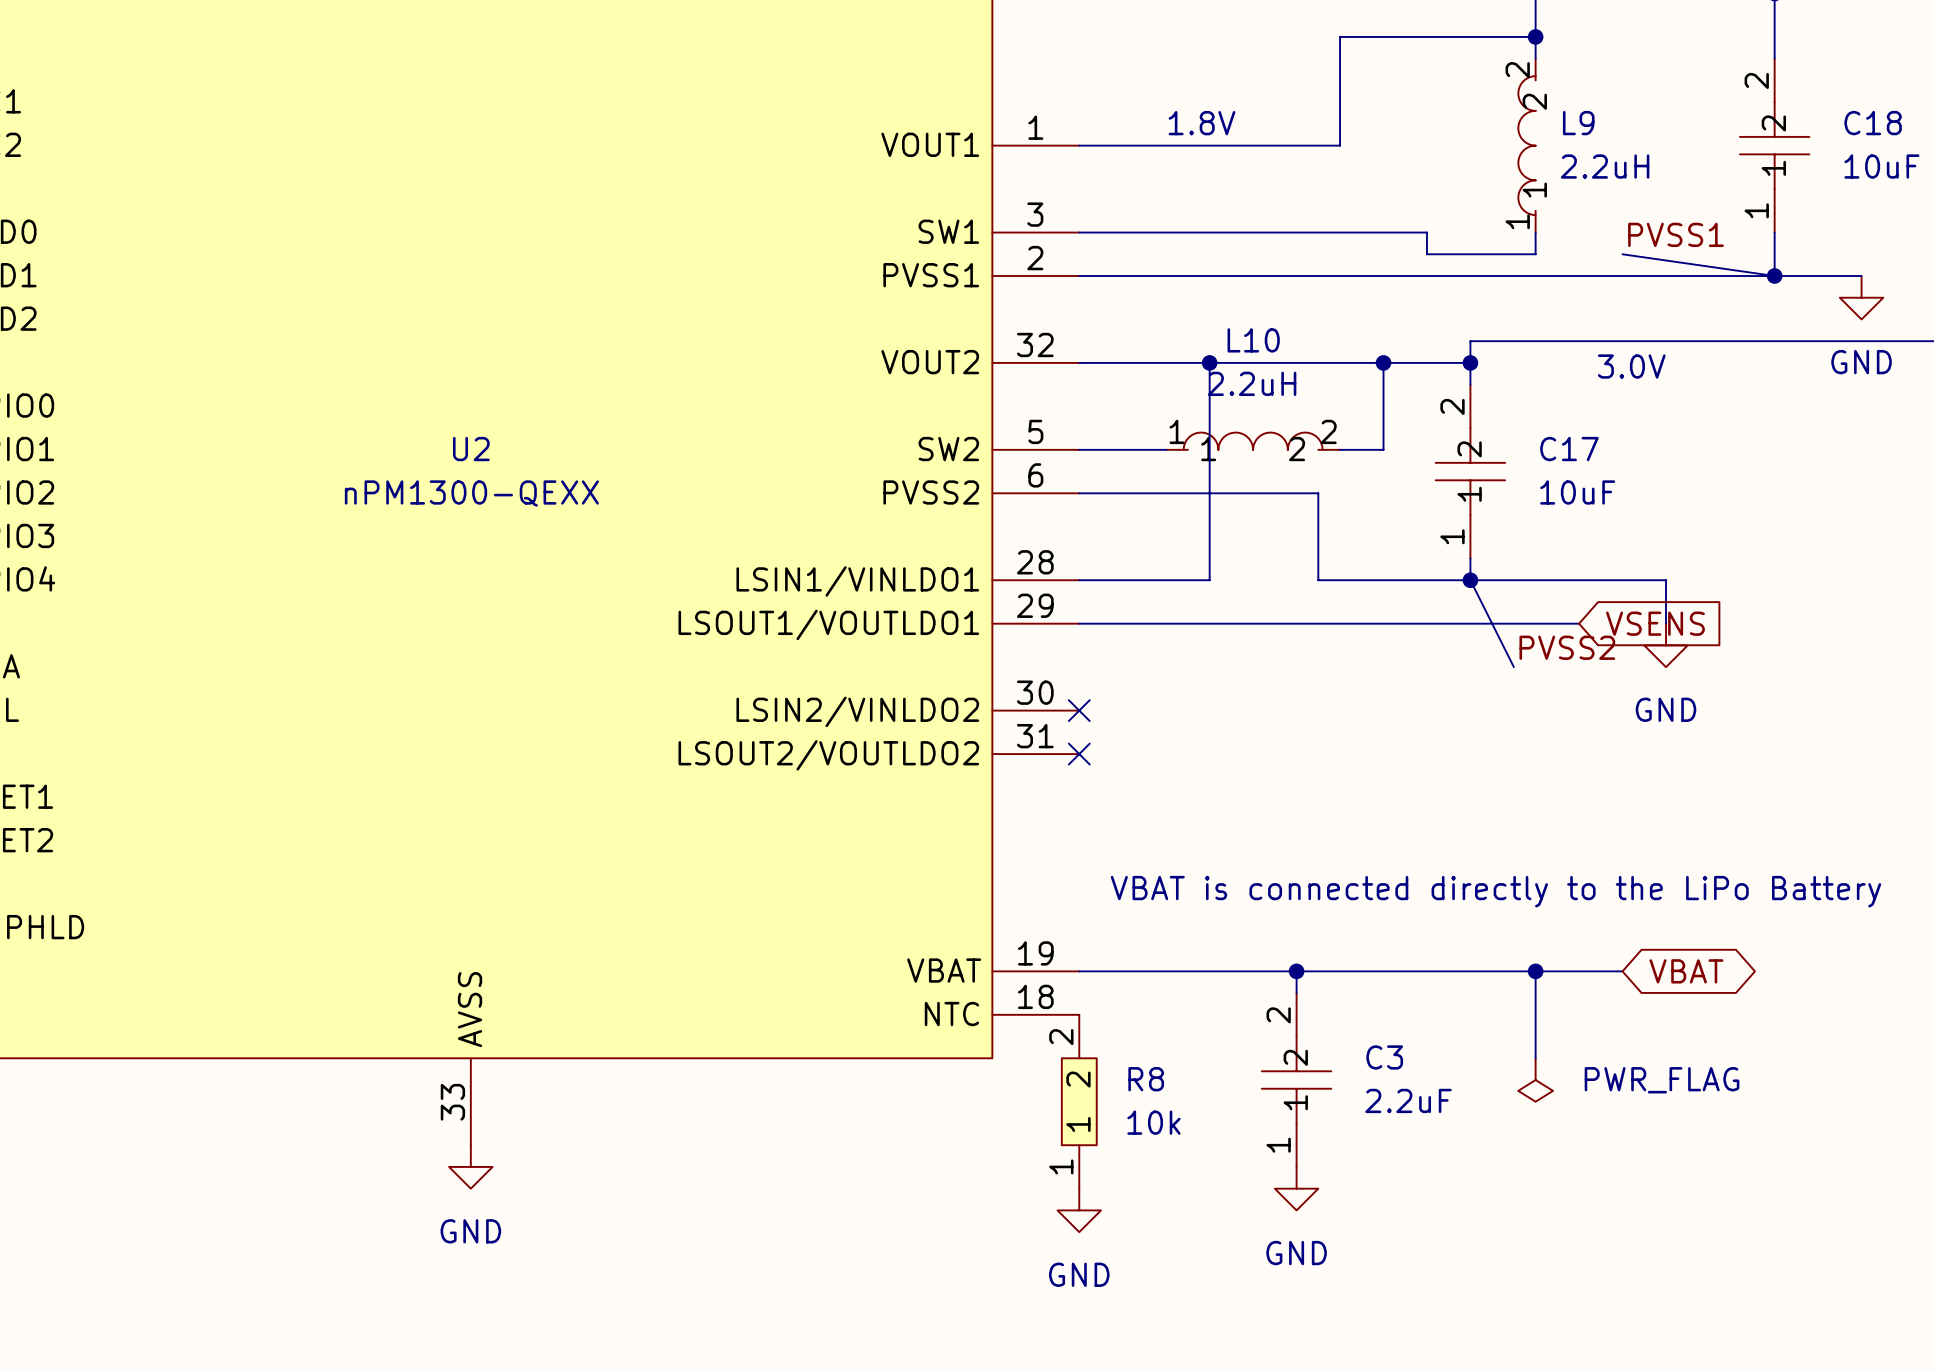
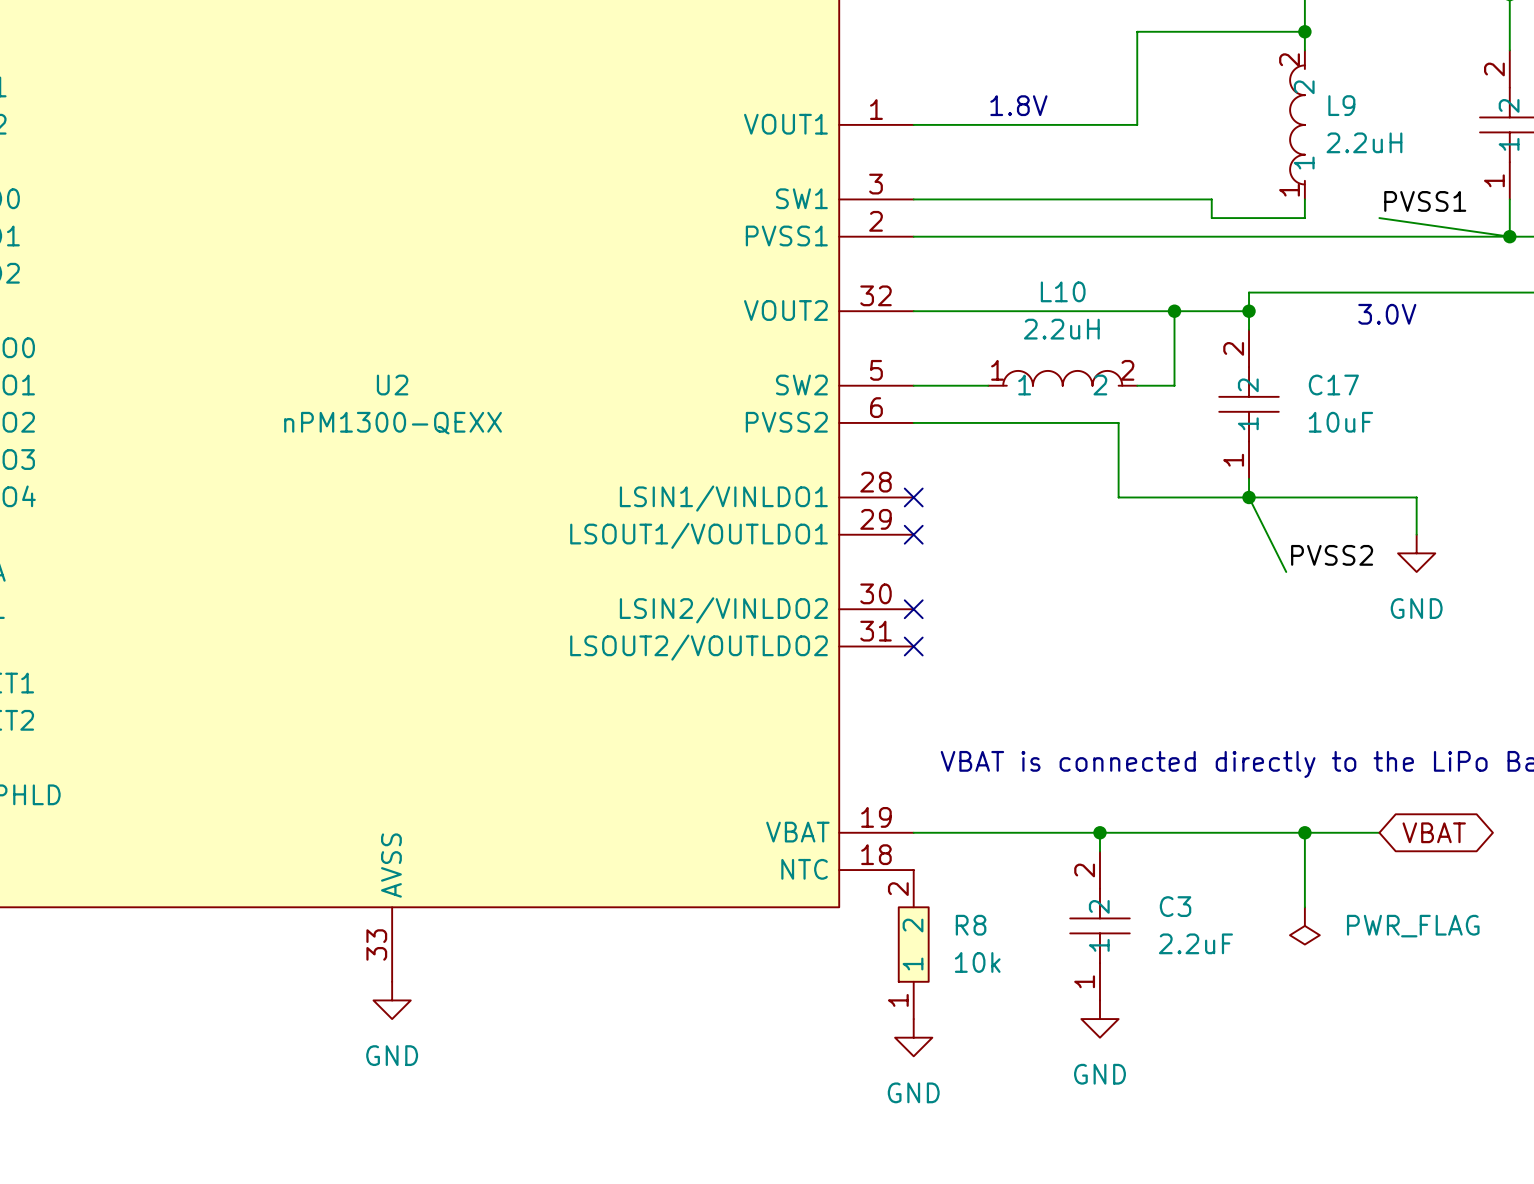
wire: (1209, 362) (1209, 580) (1079, 580) -> none
junction: (1209, 362) -> none
no-connect mark: none -> (913, 497)
wire: (1079, 623) (1579, 623) -> none
no-connect mark: none -> (913, 534)
global label: VSENS (1655, 623) -> none

